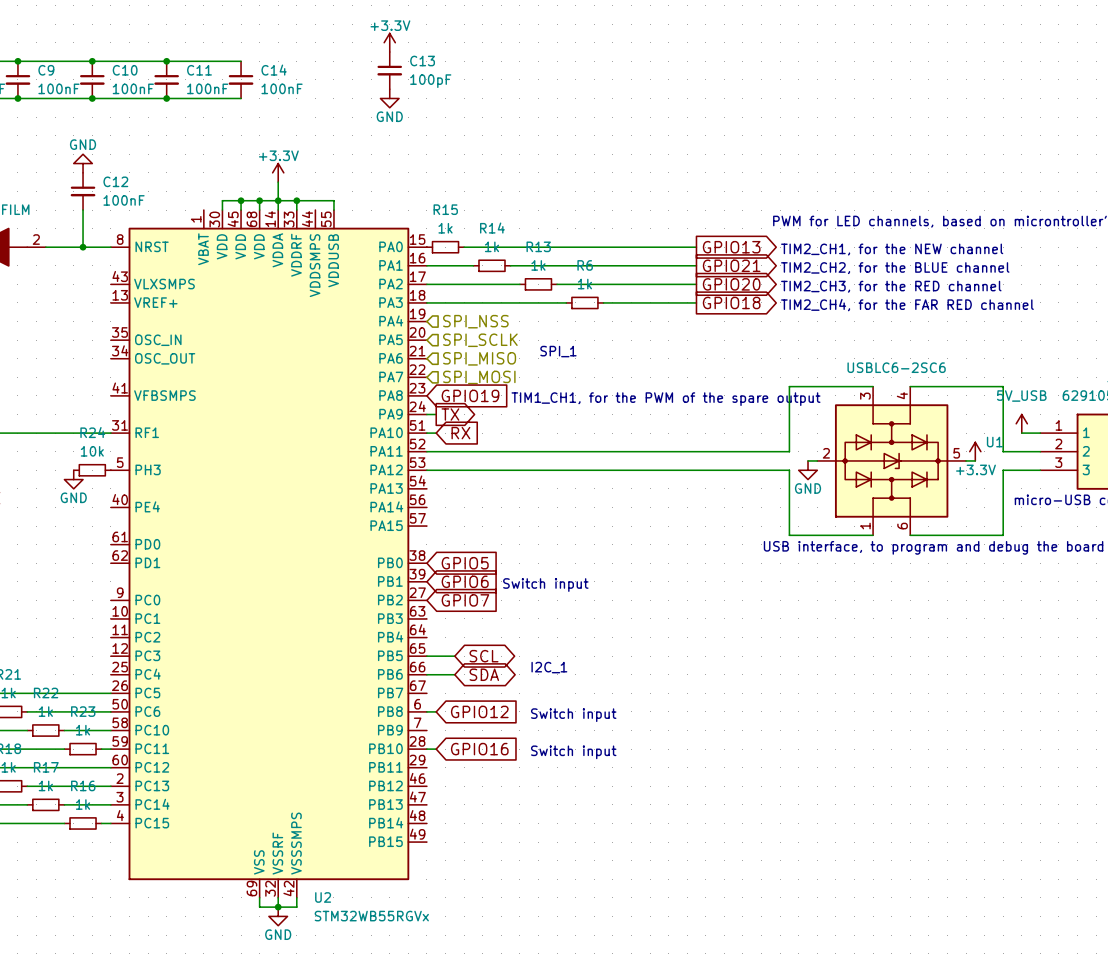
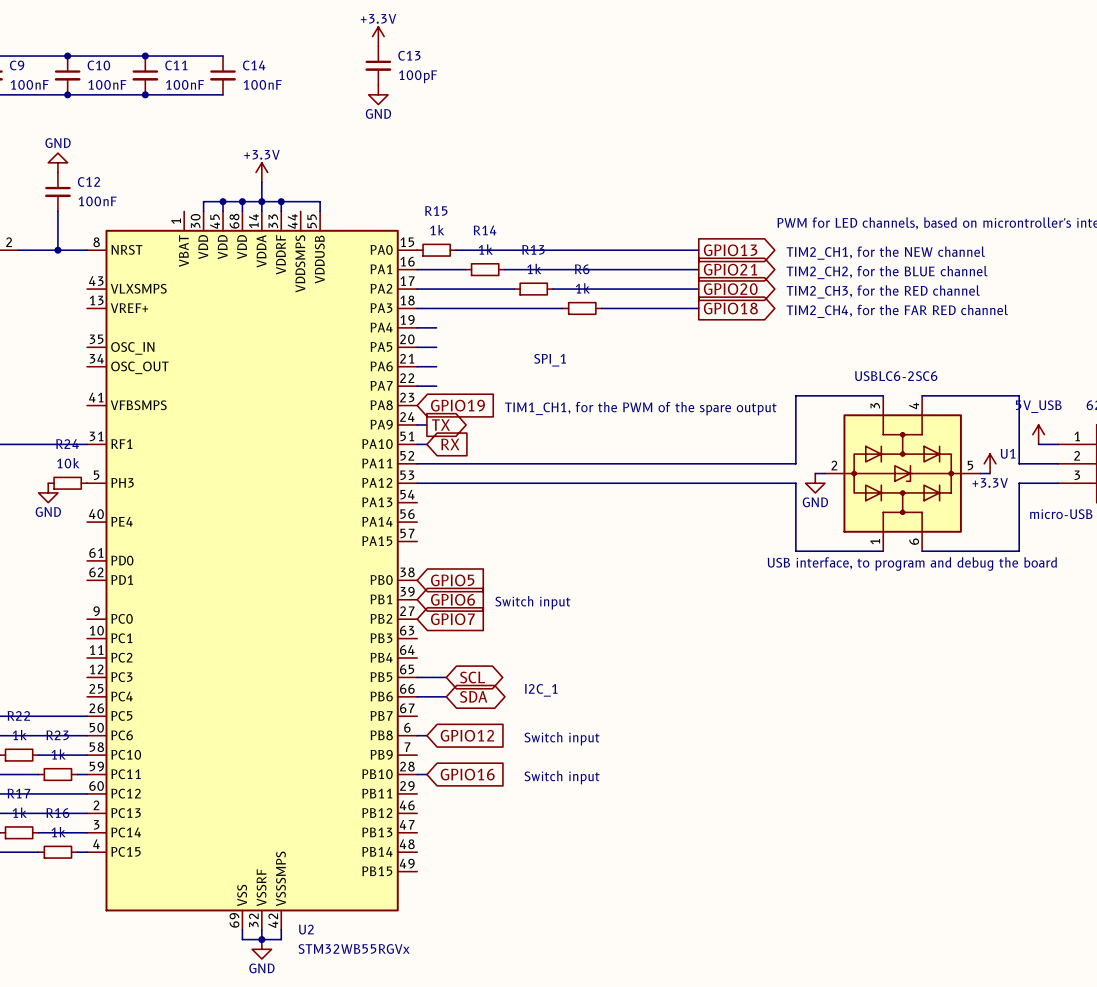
wire: none -> (417, 327) (436, 327)
hierarchical label: SPI_NSS (475, 321) -> none
wire: none -> (417, 347) (436, 347)
hierarchical label: SPI_SCLK (480, 340) -> none
wire: none -> (417, 366) (436, 366)
hierarchical label: SPI_MISO (479, 358) -> none
wire: none -> (417, 386) (436, 386)
hierarchical label: SPI_MOSI (479, 377) -> none

